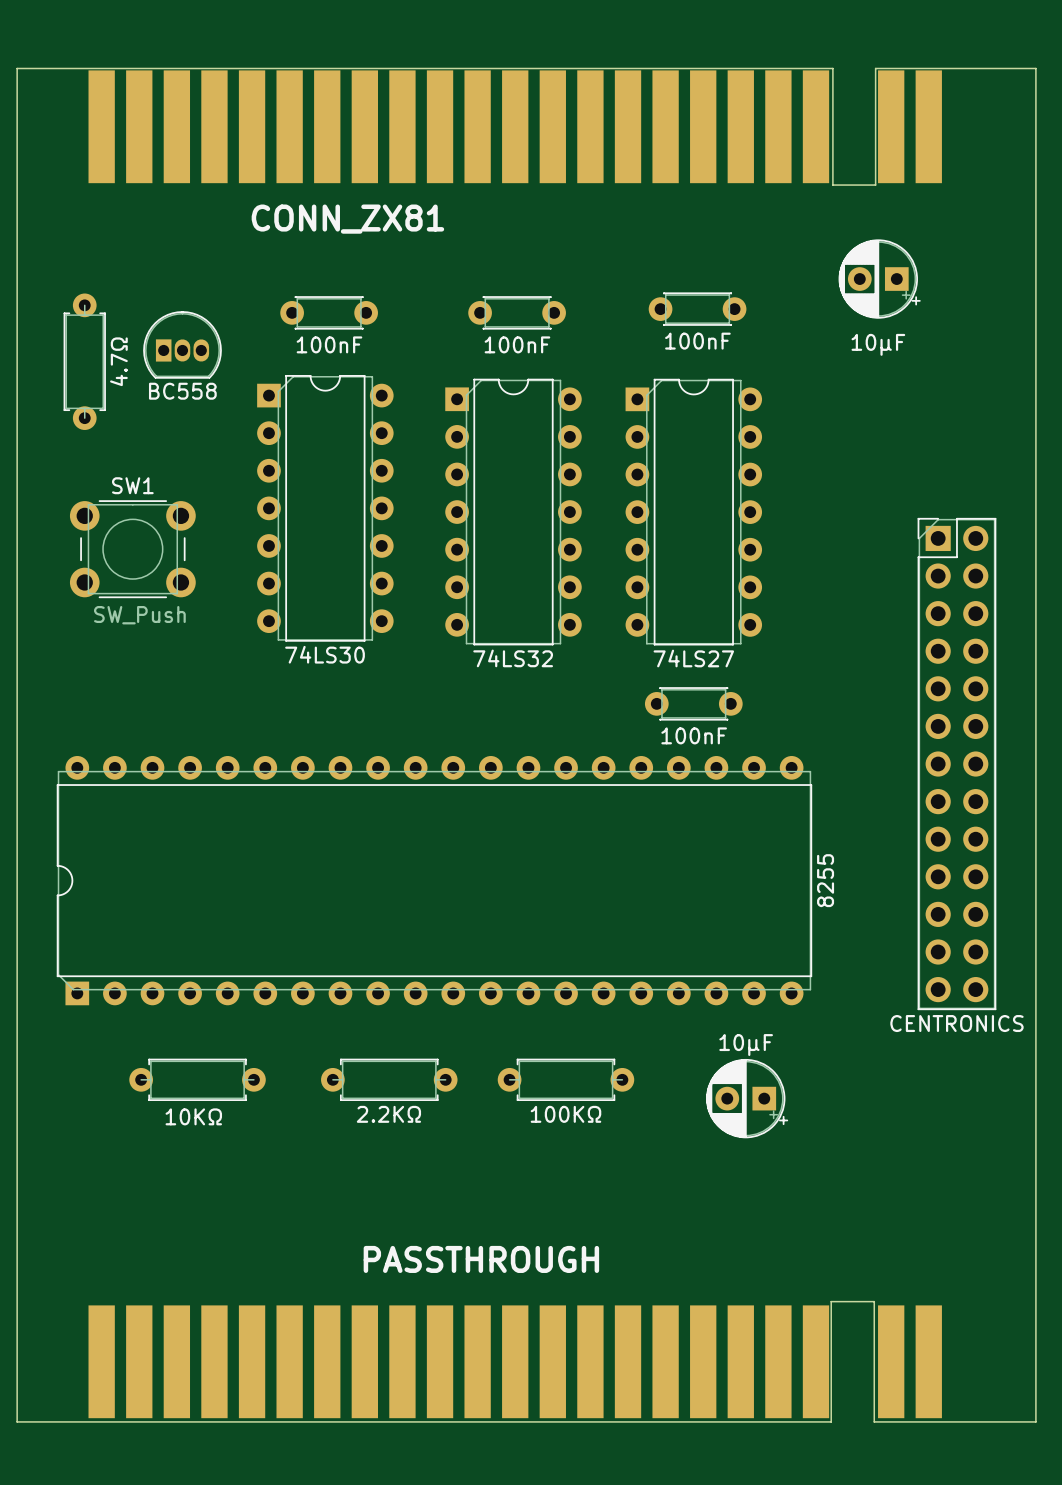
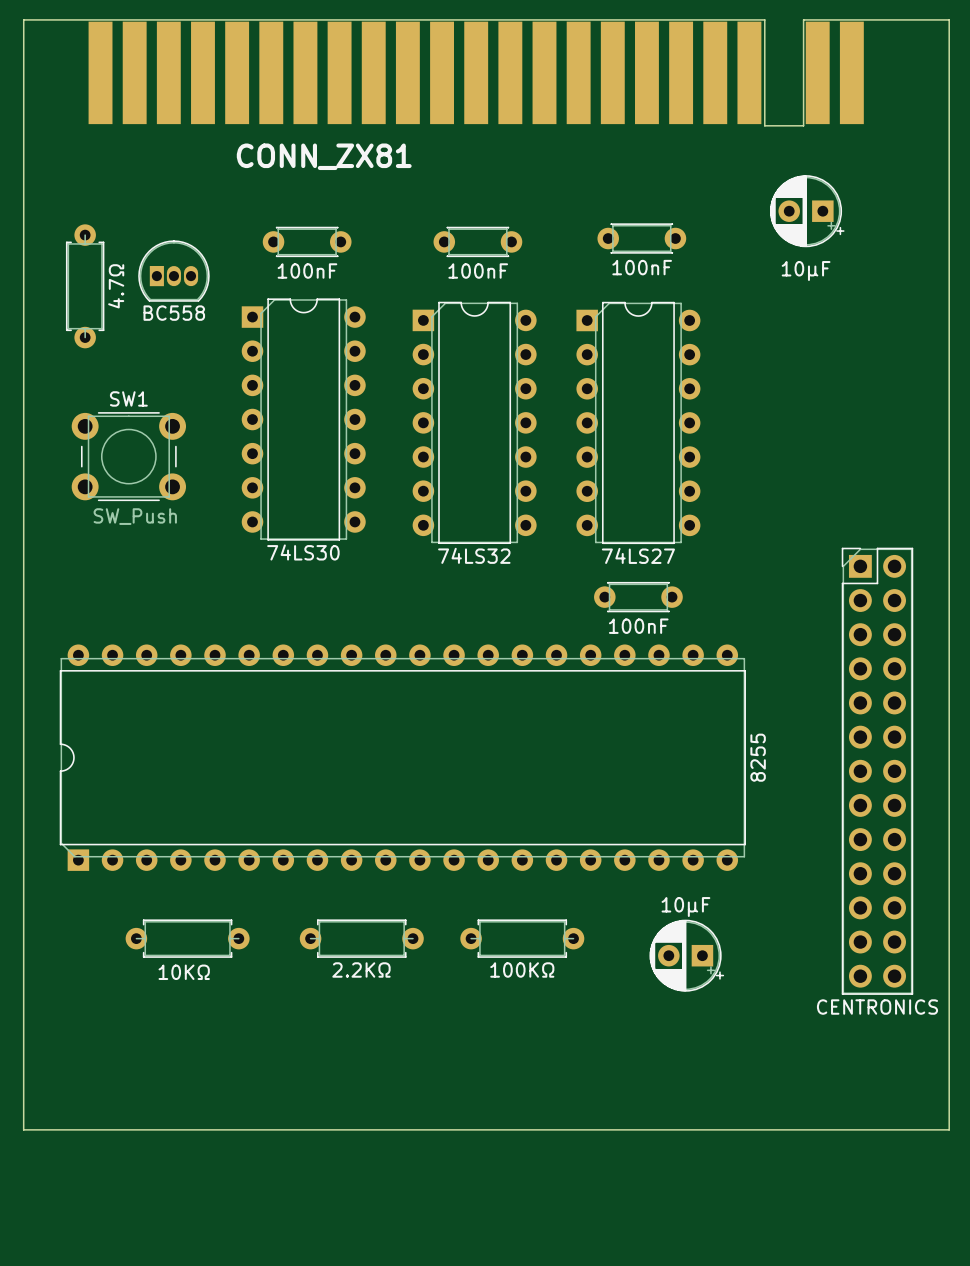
part position: (956, 764) -> (877, 771)
board edge: (17, 1290) (17, 1421) (831, 1421) (831, 1301) (874, 1301) (874, 1421) (1035, 1421) (1035, 1290) -> (23, 1129) (949, 1129)
part: PASSTHROUGH (515, 1361) -> none

